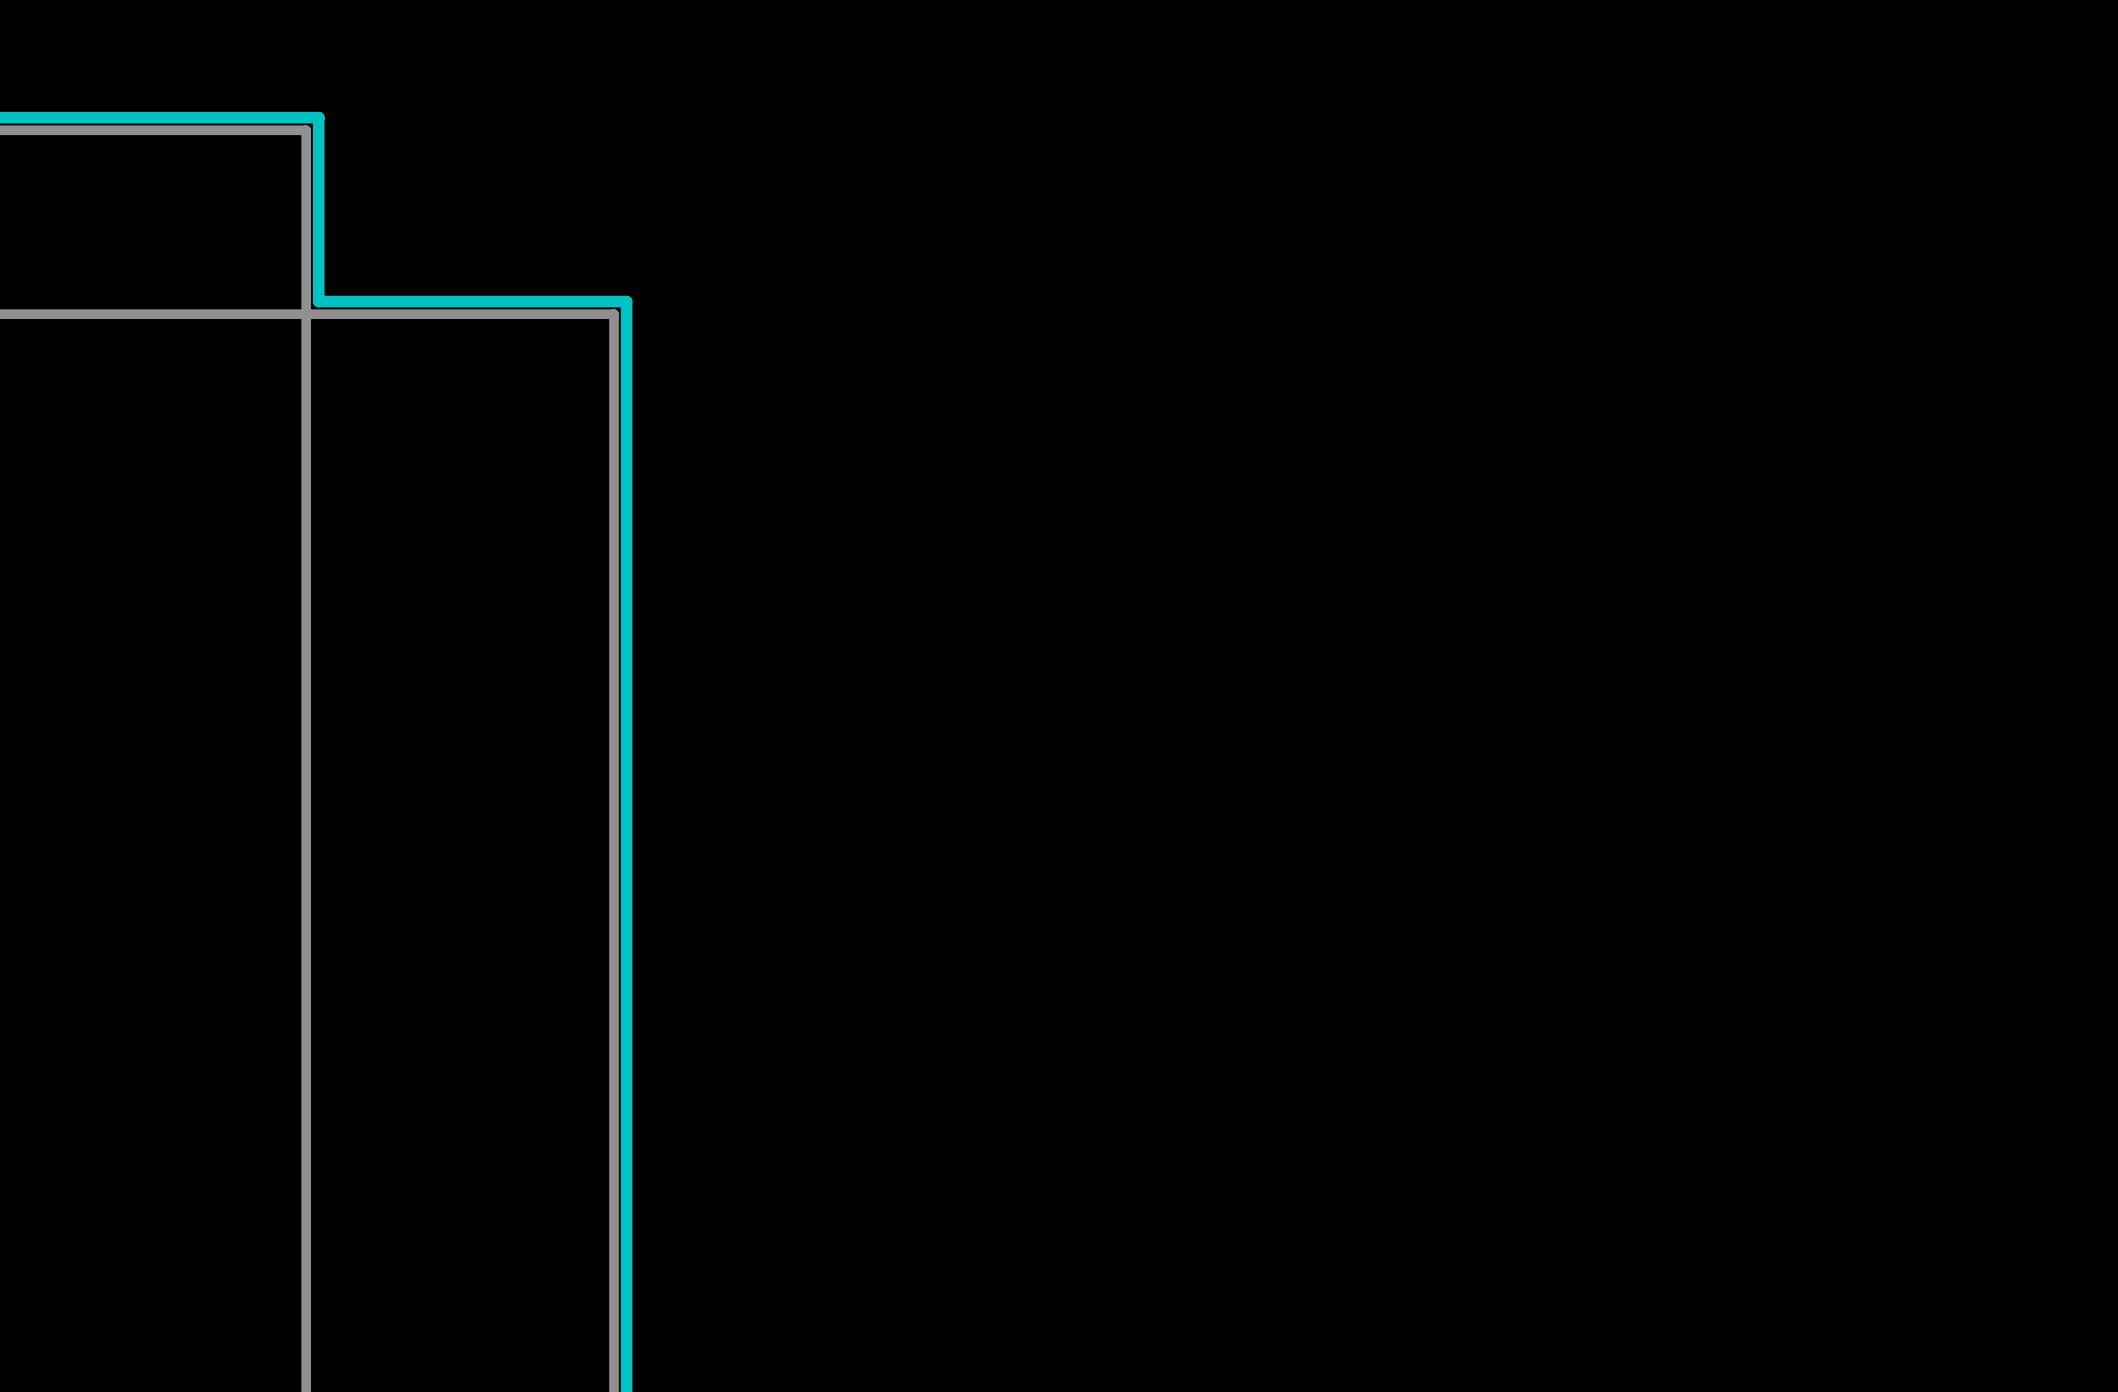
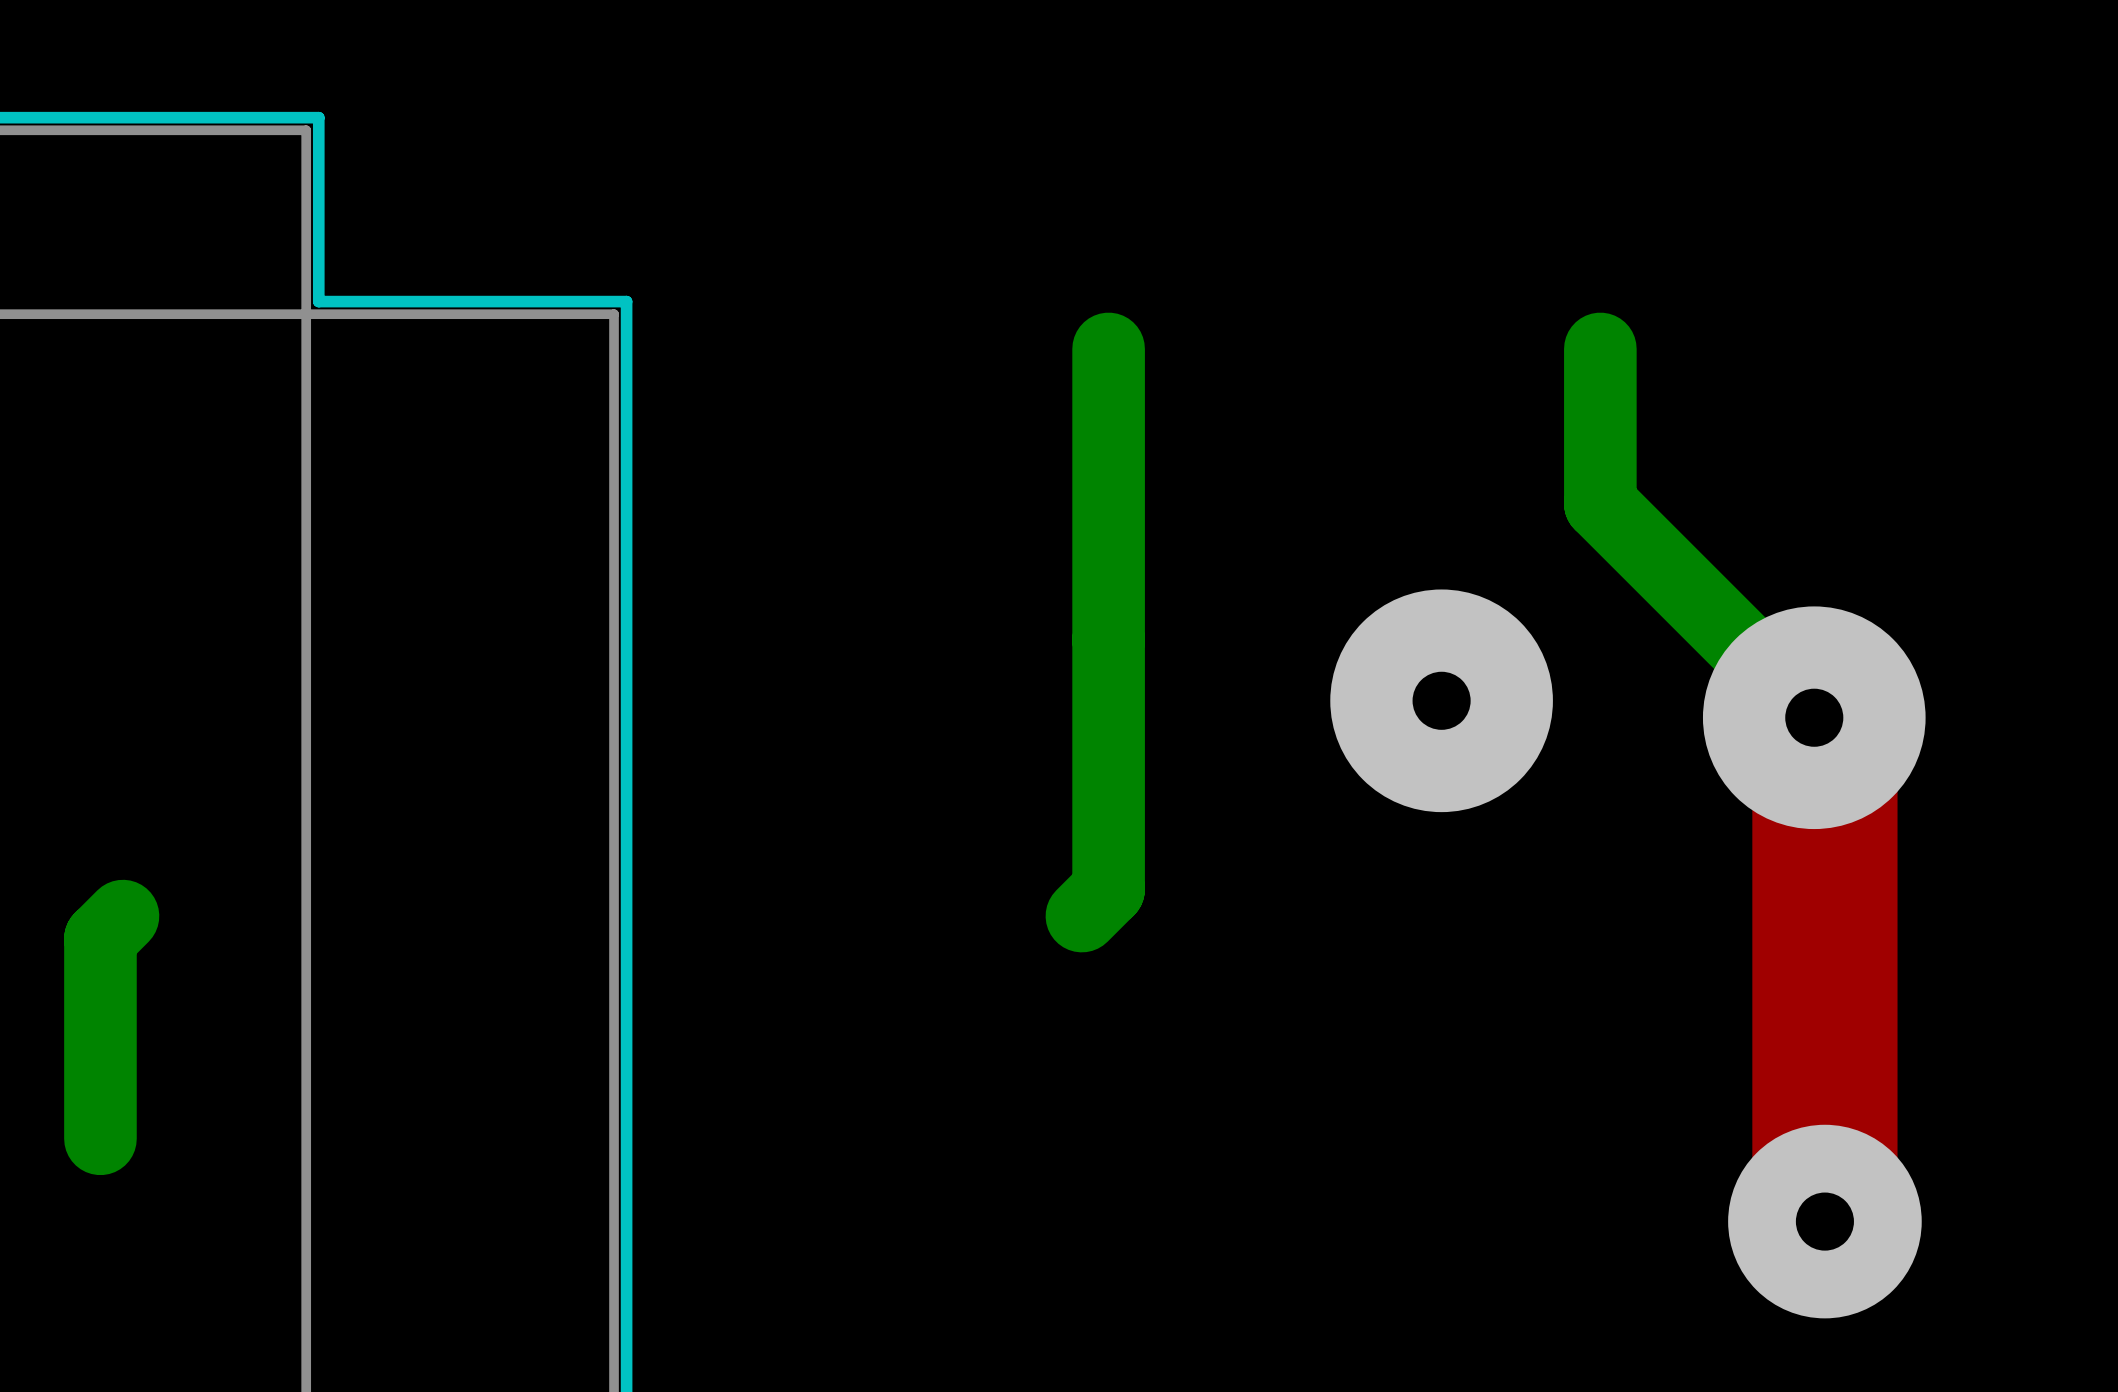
bottom track: none -> (1108, 348) (1108, 889) (1081, 916)
bottom track: none -> (1600, 348) (1600, 503) (1814, 717)
via: none -> (1441, 700)
via: none -> (1814, 717)
top track: none -> (1824, 728) (1824, 1221)
bottom track: none -> (123, 916) (100, 938) (100, 1138)
via: none -> (1824, 1221)

